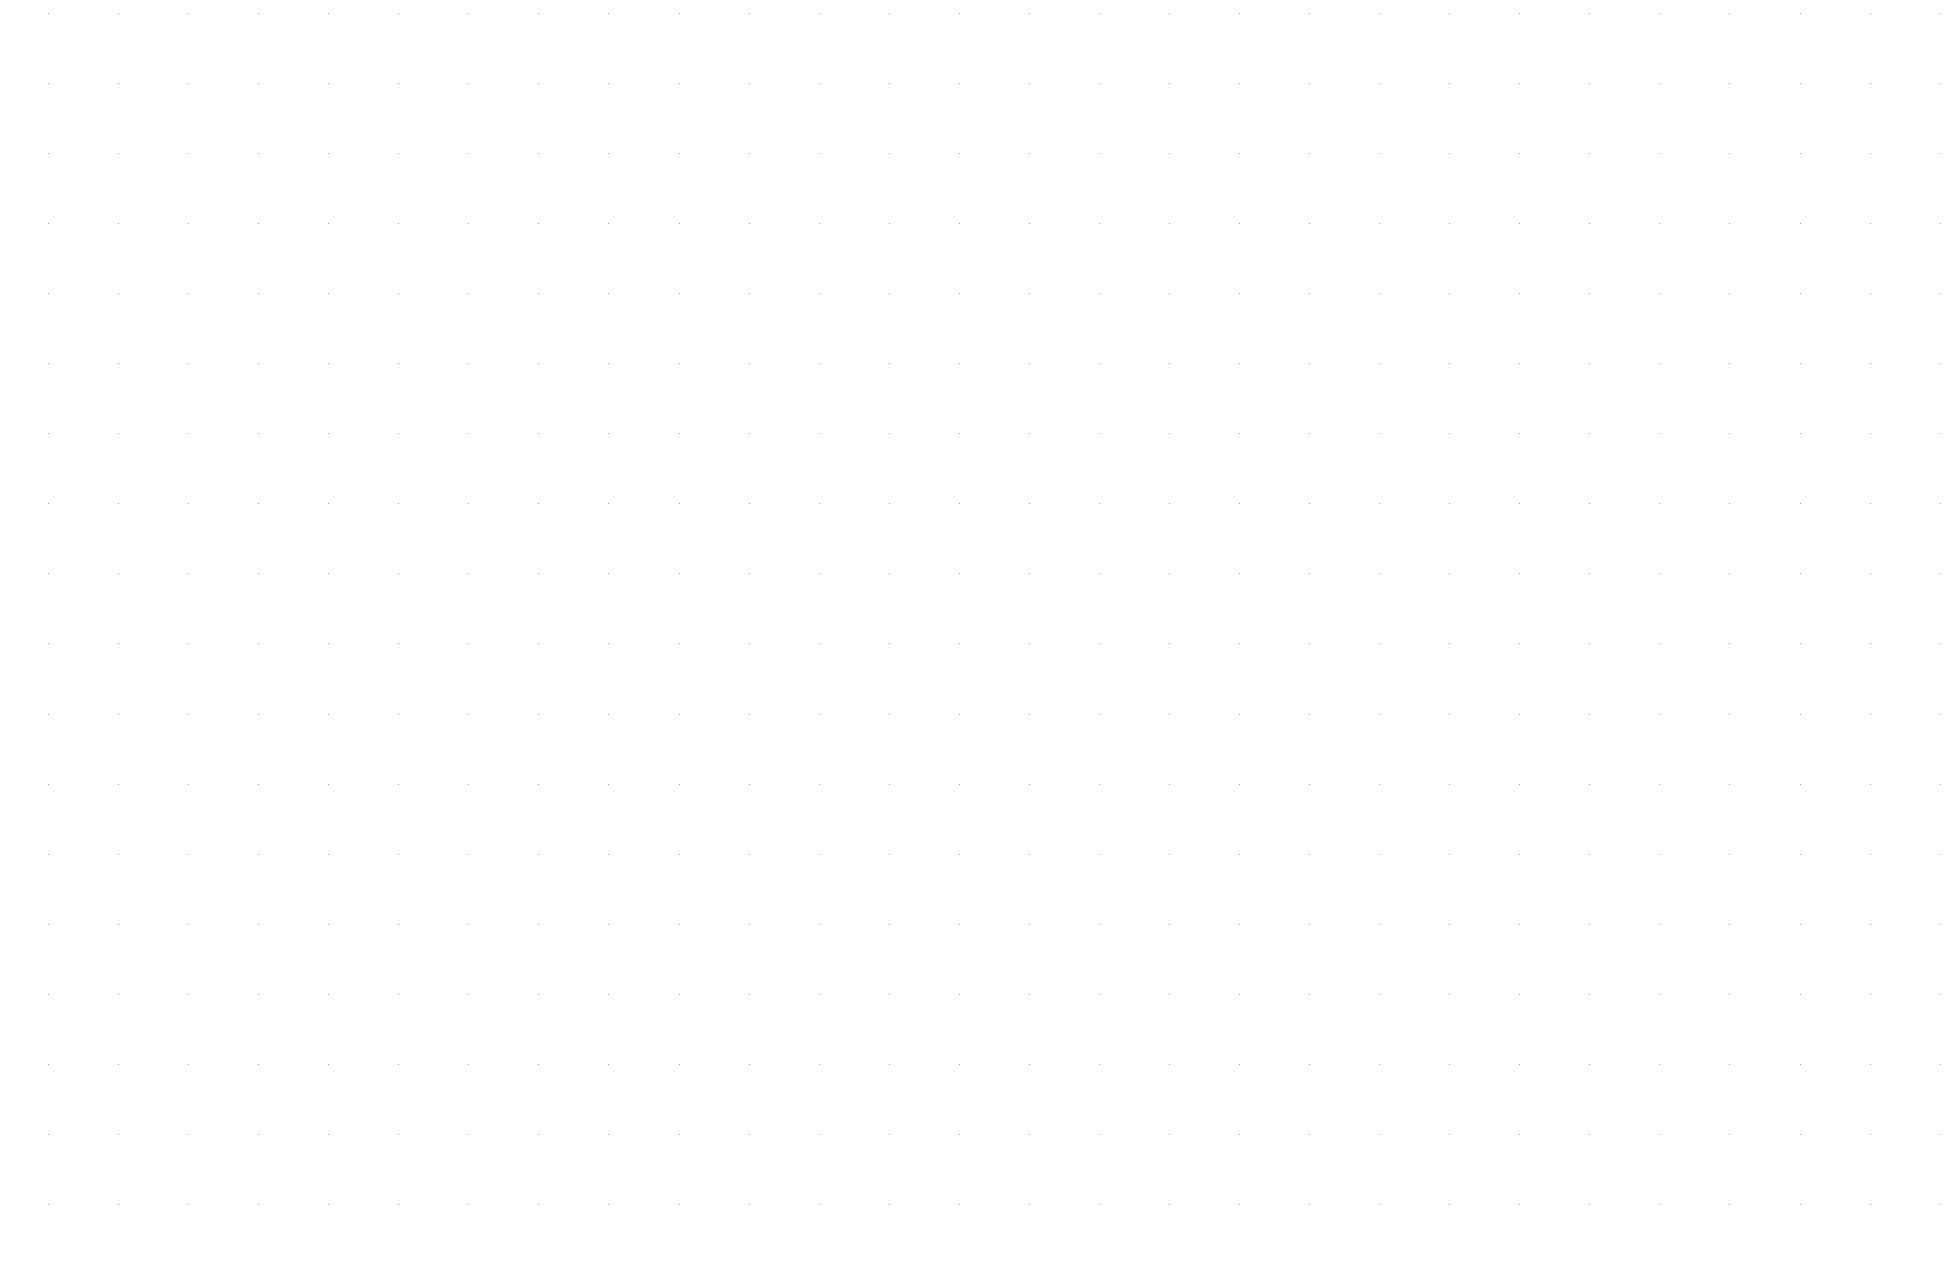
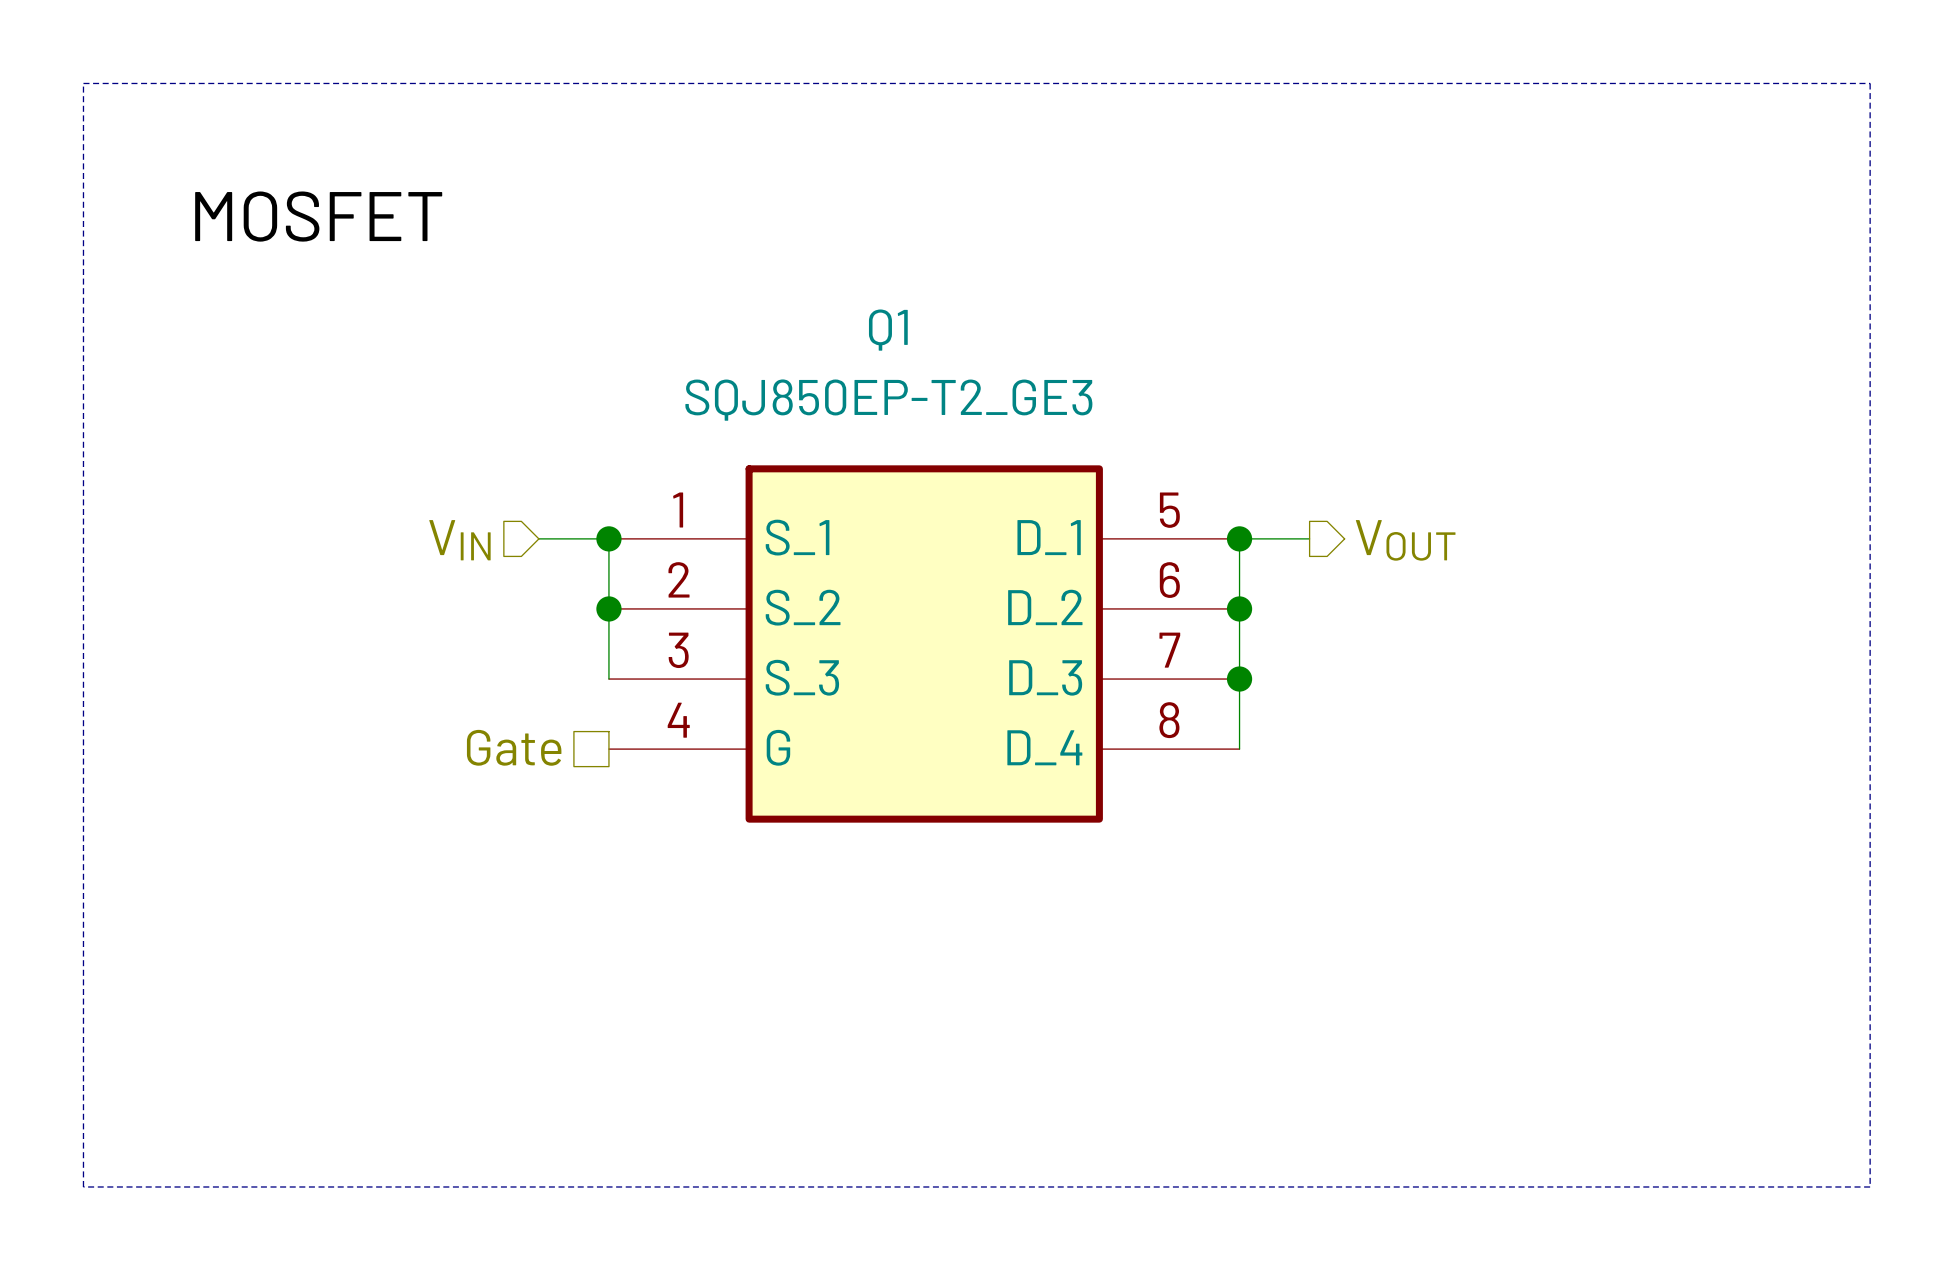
line: none -> (83, 83) (1870, 83) (1870, 1186) (83, 1186) (83, 83)
label: none -> MOSFET (318, 216)
wire: none -> (538, 538) (608, 538) (608, 679)
junction: none -> (608, 538)
junction: none -> (1239, 538)
wire: none -> (1309, 538) (1239, 538) (1239, 749)
hierarchical label: none -> VIN (459, 540)
hierarchical label: none -> VOUT (1405, 540)
junction: none -> (608, 608)
junction: none -> (1239, 608)
Q1: none -> SQJ850EP-T2_GE3 (924, 643)
junction: none -> (1239, 679)
hierarchical label: none -> Gate (514, 747)

